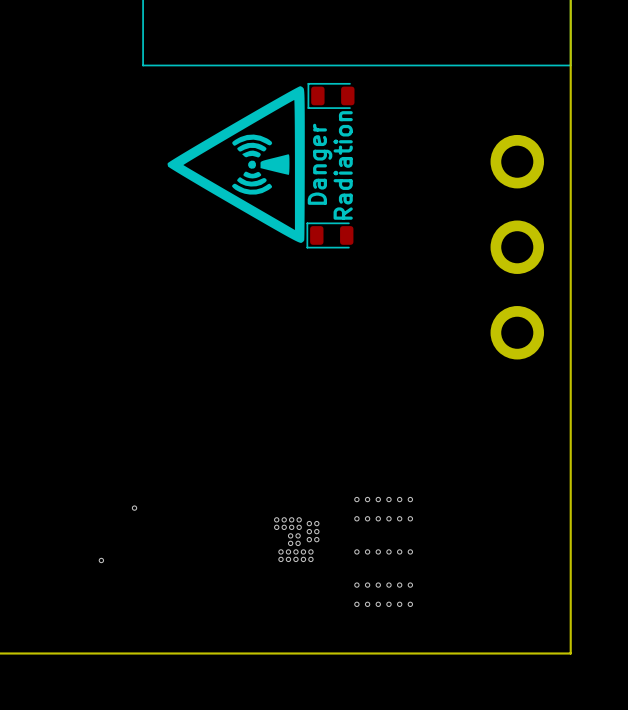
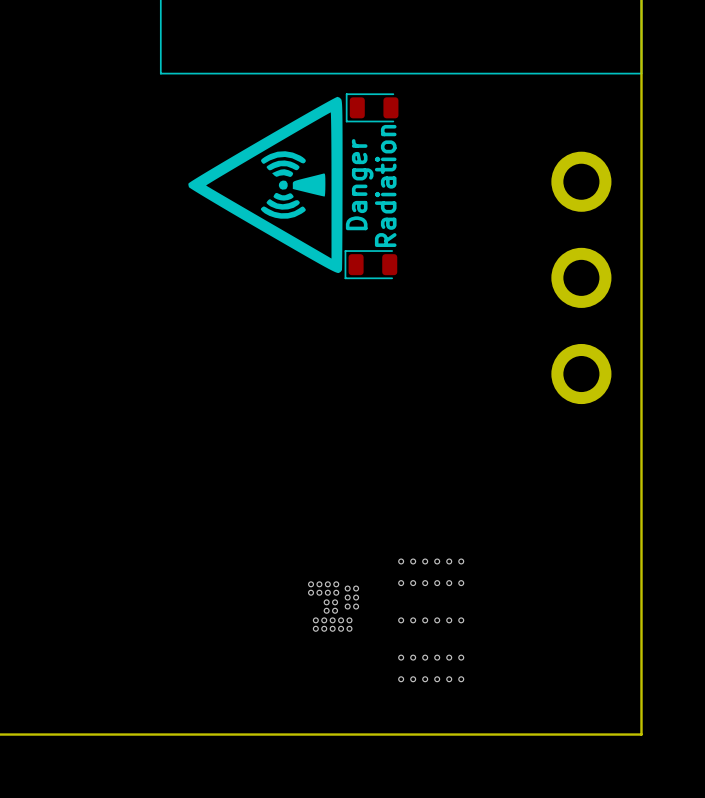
via: (134, 508) -> none
via: (101, 560) -> none

